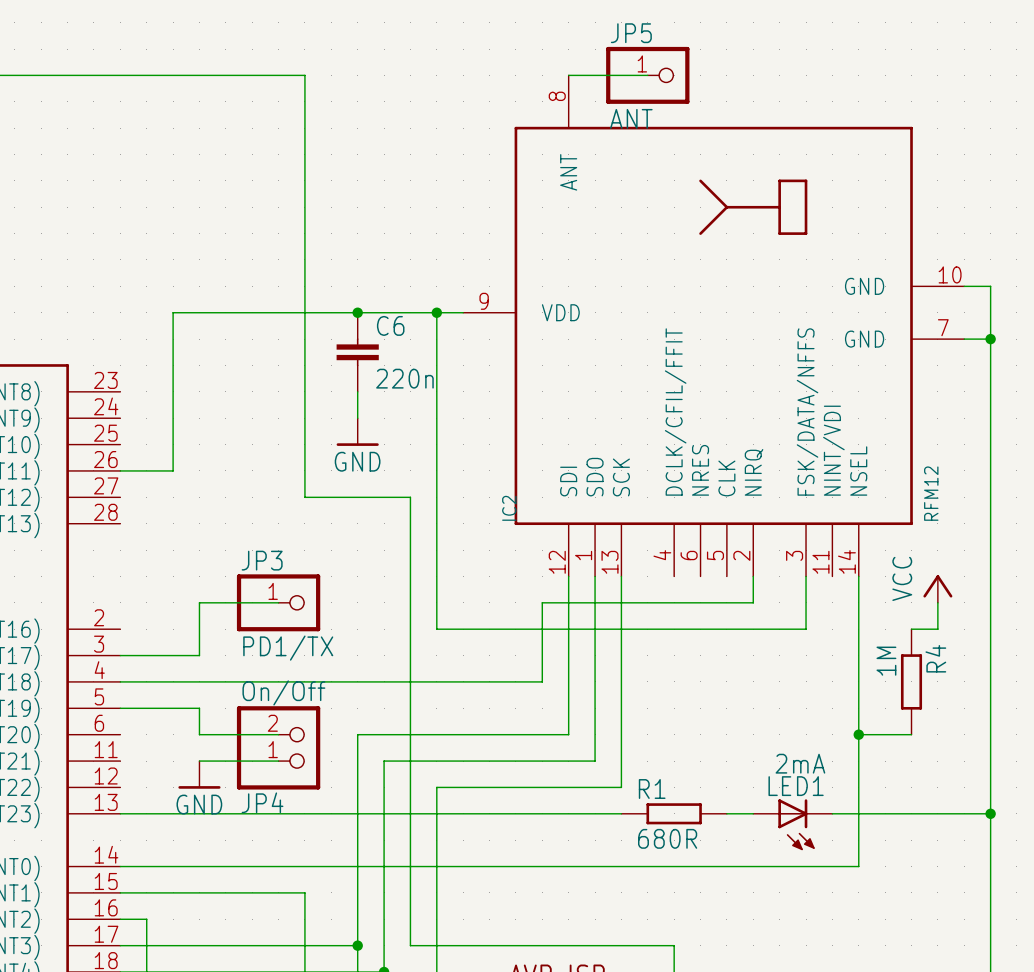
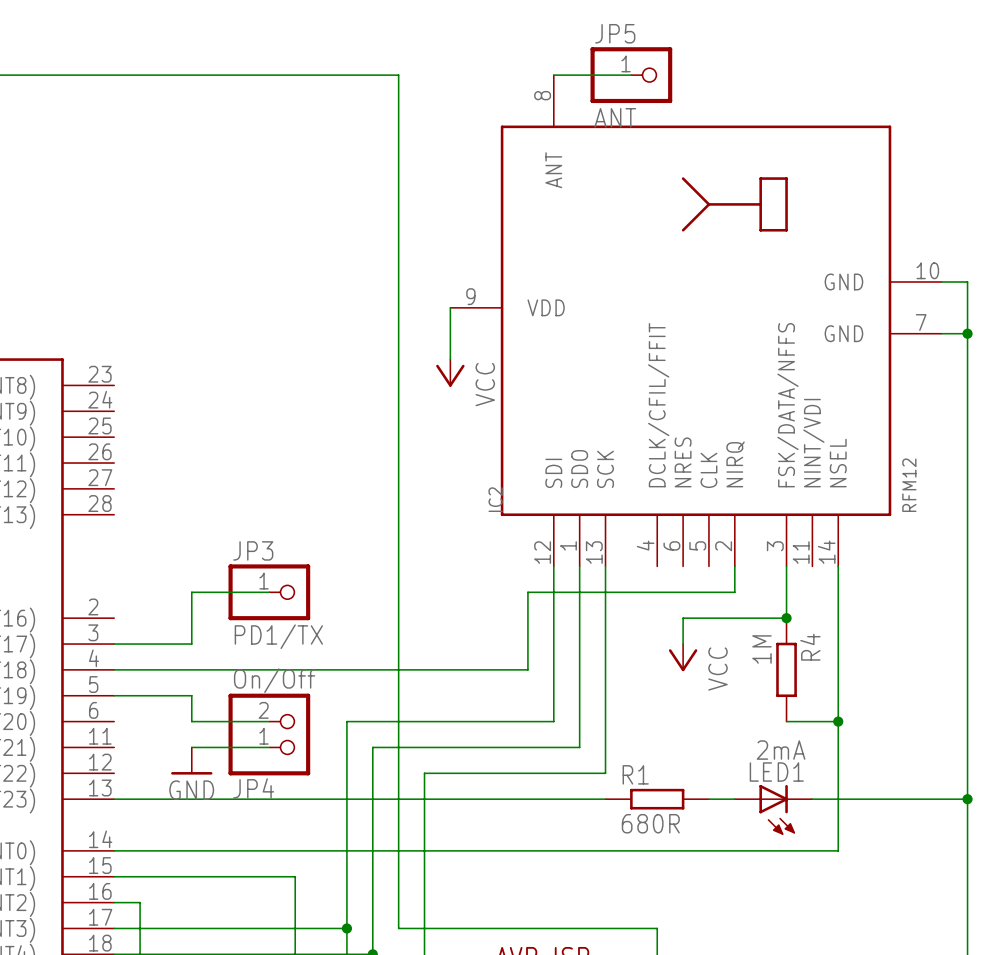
wire: (304, 75) (304, 497) (410, 497) -> (295, 75) (398, 75) (398, 488)
junction: (357, 312) -> none
wire: (436, 312) (436, 629) (700, 629) -> (683, 644) (683, 618)
junction: (436, 312) -> none
wire: (463, 312) (173, 312) (173, 470) (120, 470) -> (450, 307) (450, 359)
C6: 220n (357, 352) -> none
power symbol: none -> VCC (450, 373)
wire: (357, 391) (357, 418) -> none
power symbol: GND (357, 432) -> none
power symbol rotation: 0° (937, 586) -> 180° (683, 660)
power symbol position: VCC (937, 588) -> VCC (683, 657)
wire: (937, 602) (937, 629) (911, 629) -> none
junction: none -> (786, 618)
R4 position: (911, 681) -> (786, 669)
wire: (858, 734) (911, 734) -> (838, 721) (786, 721)

